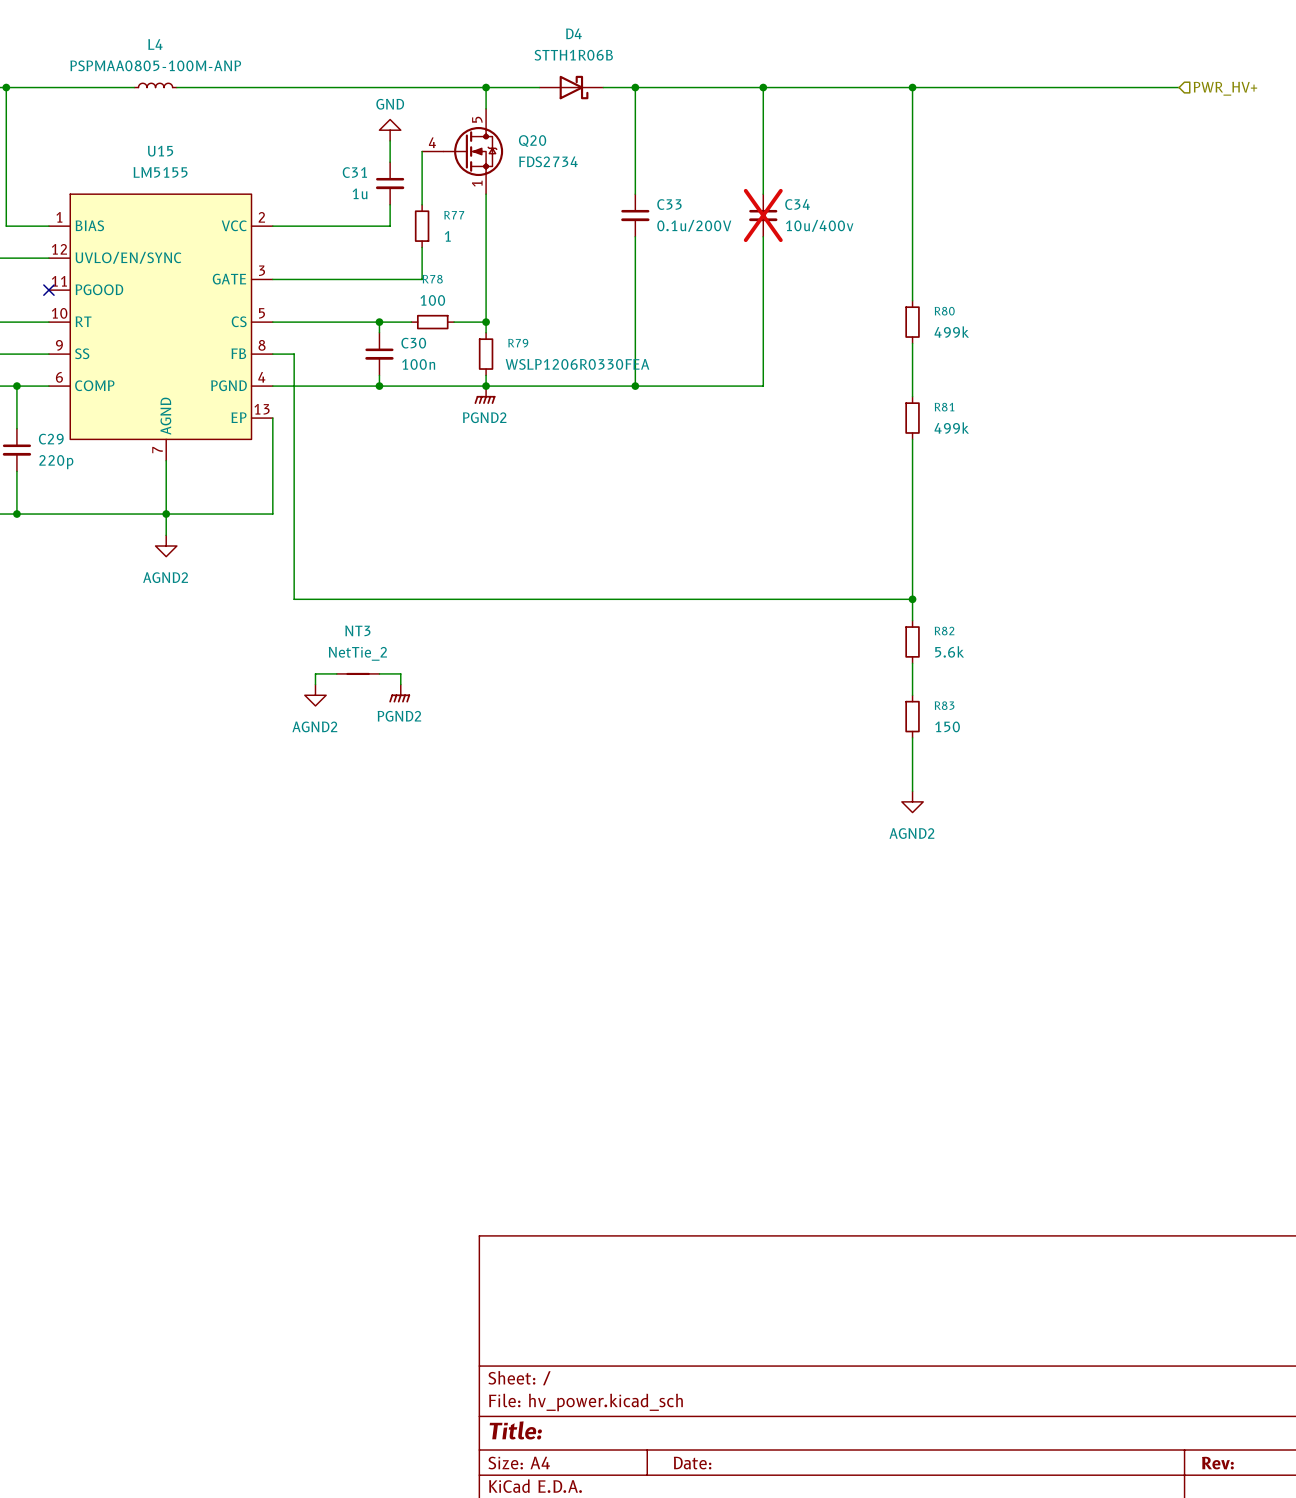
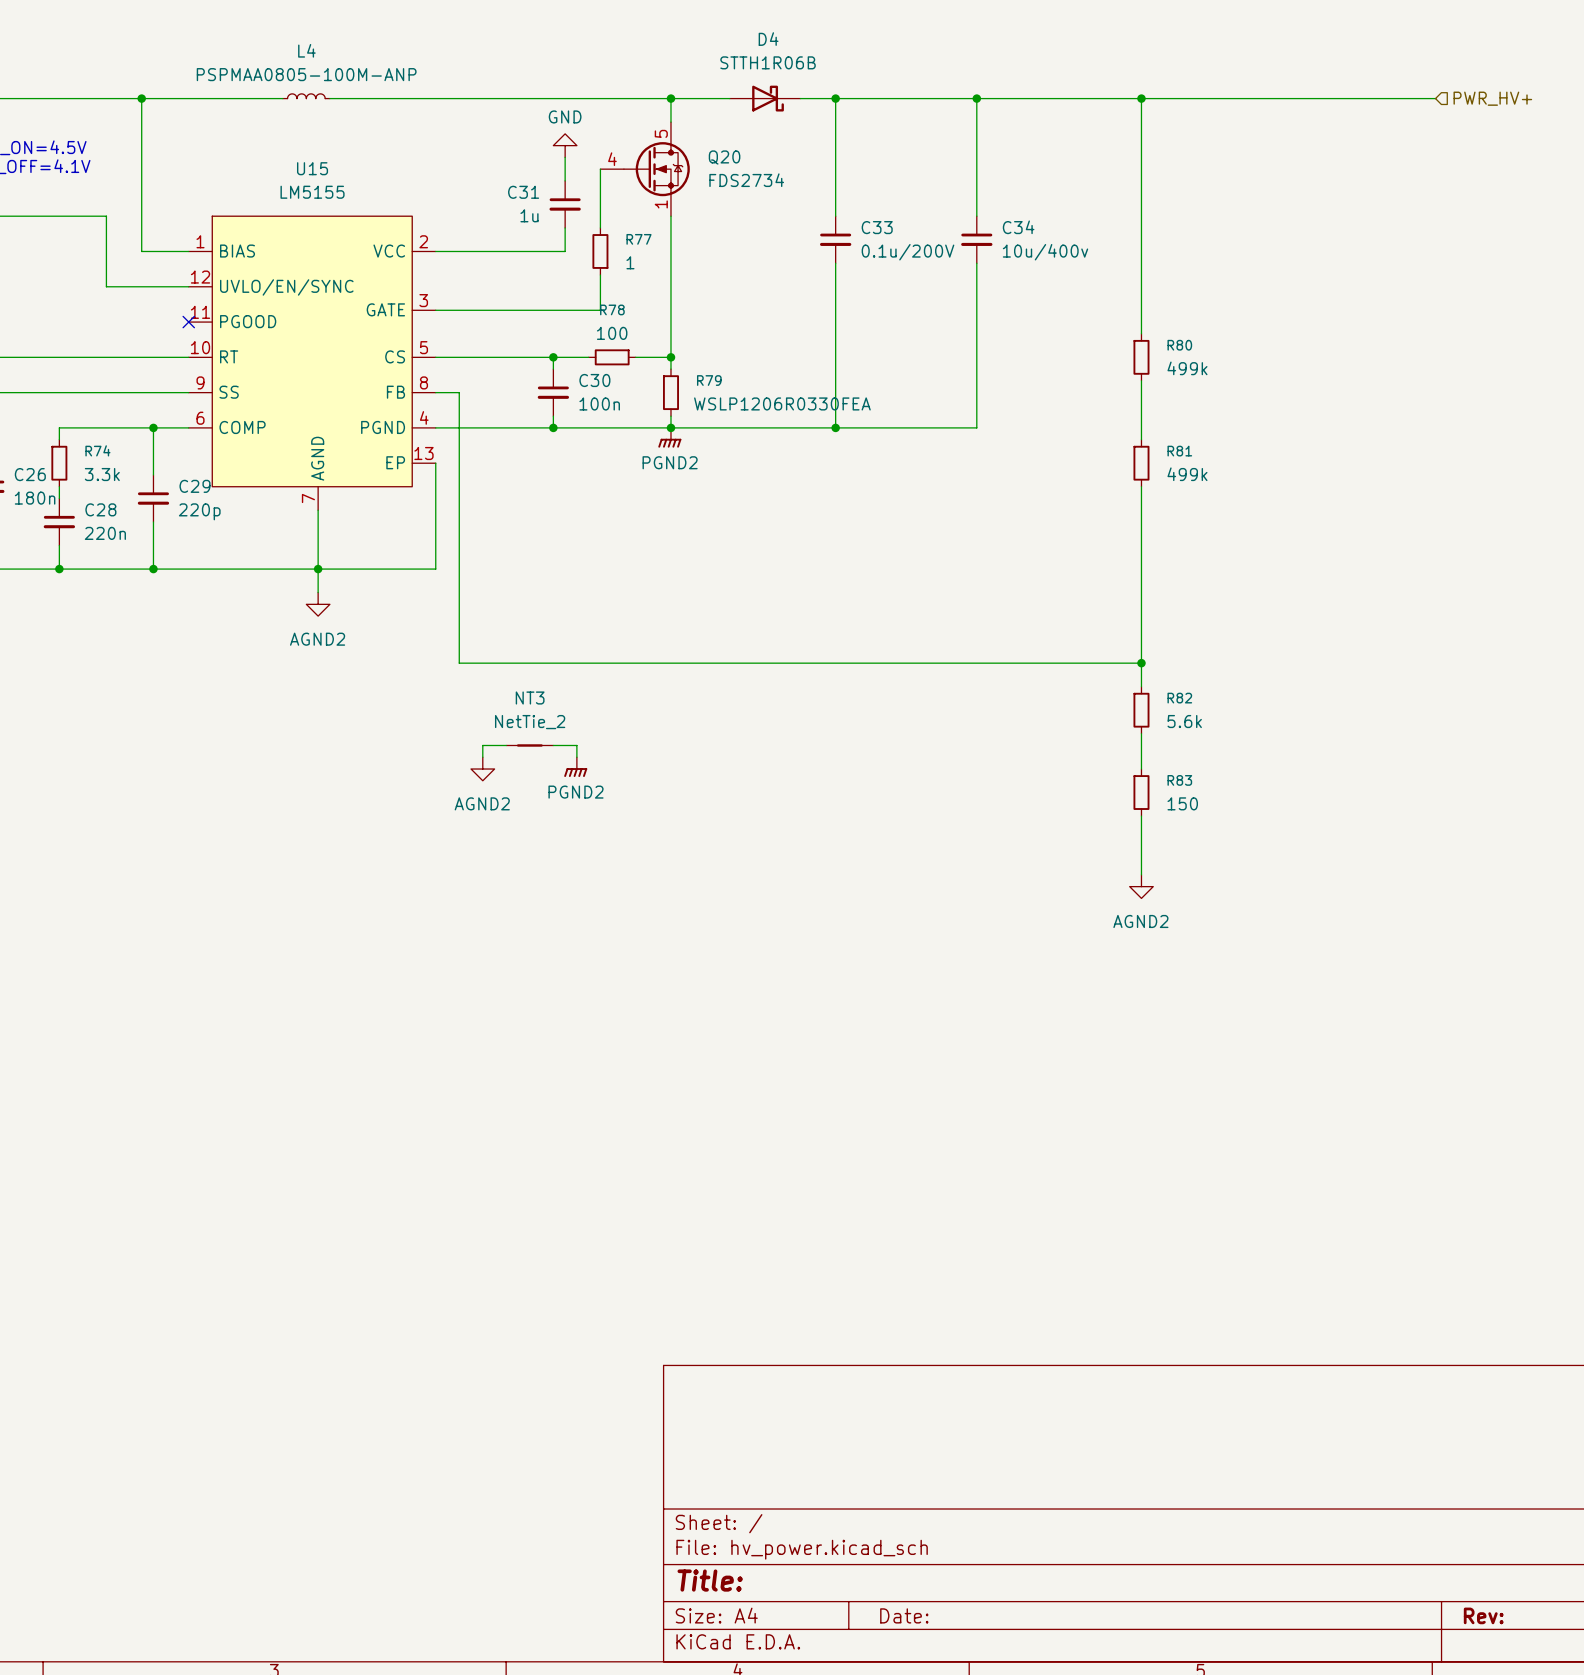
C34 do-not-place cross: (763, 215) -> none

